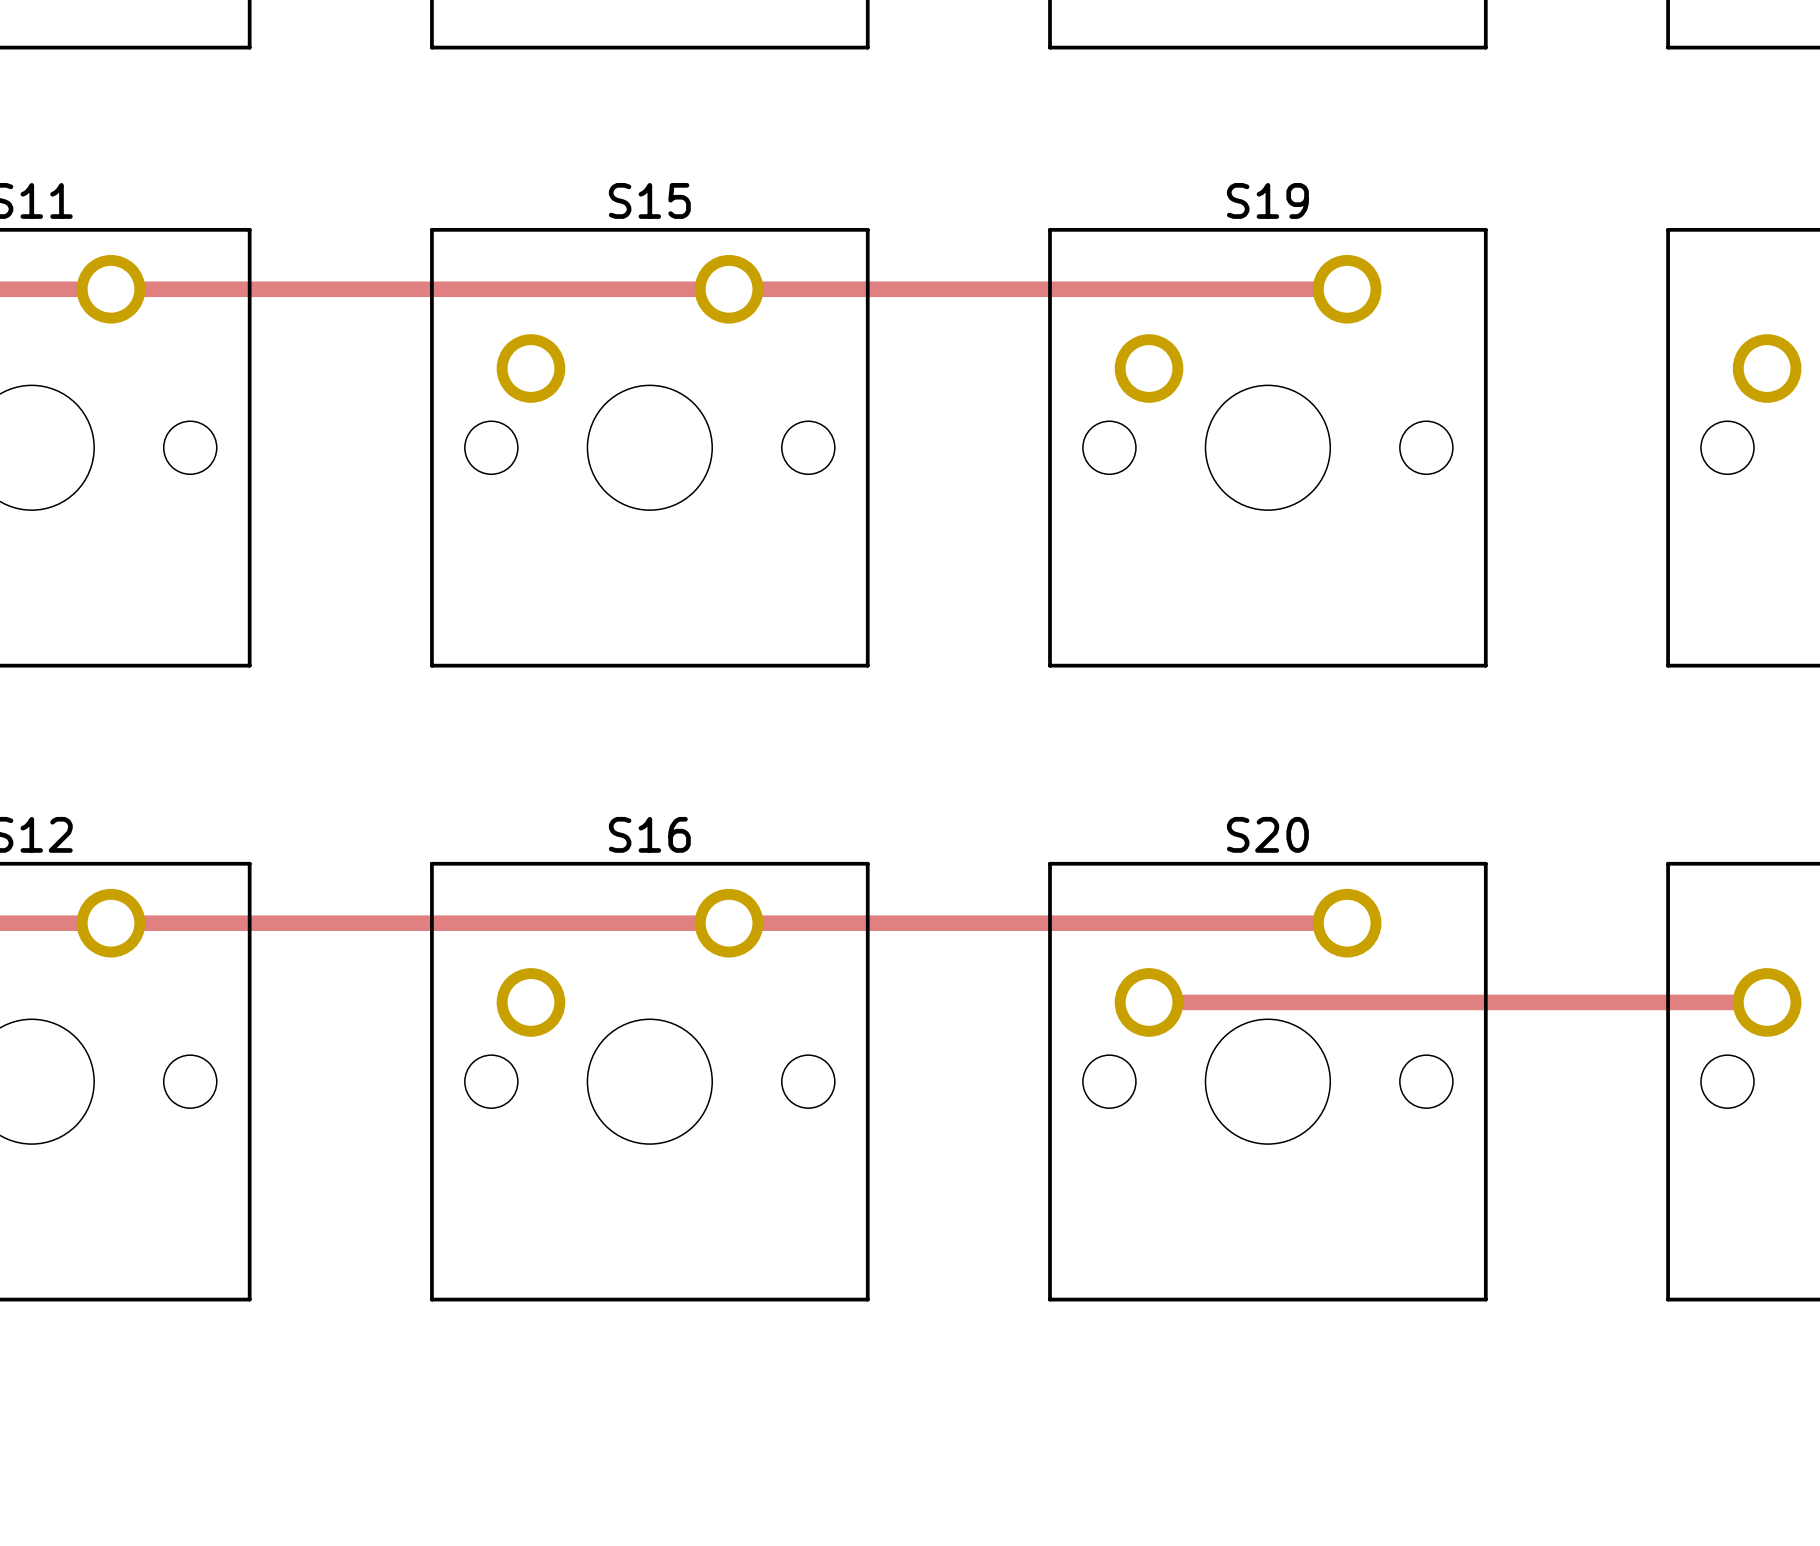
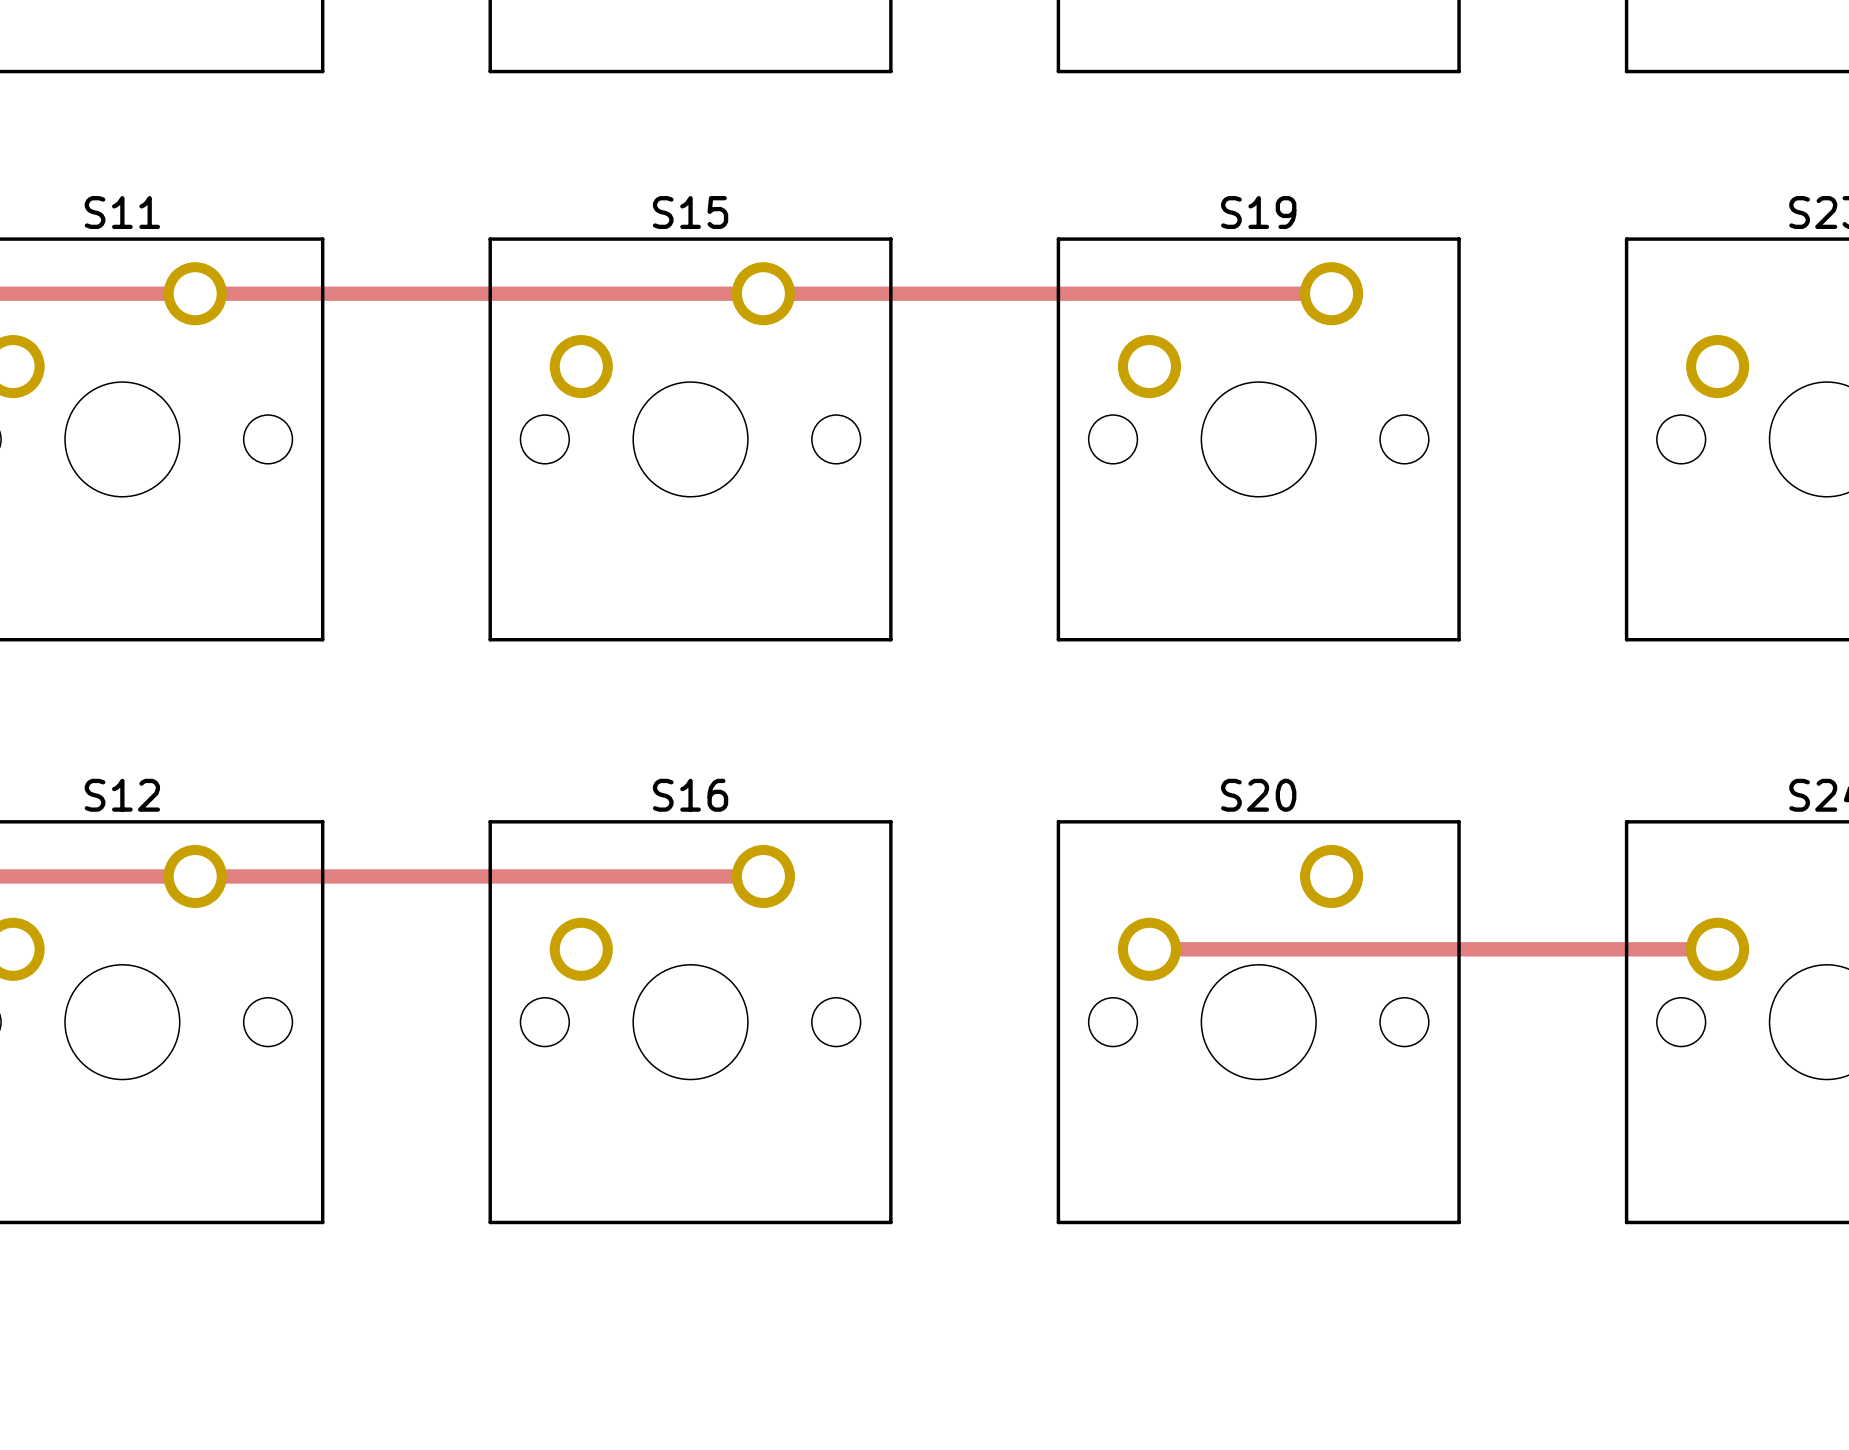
track: (729, 923) (1347, 923) -> none

